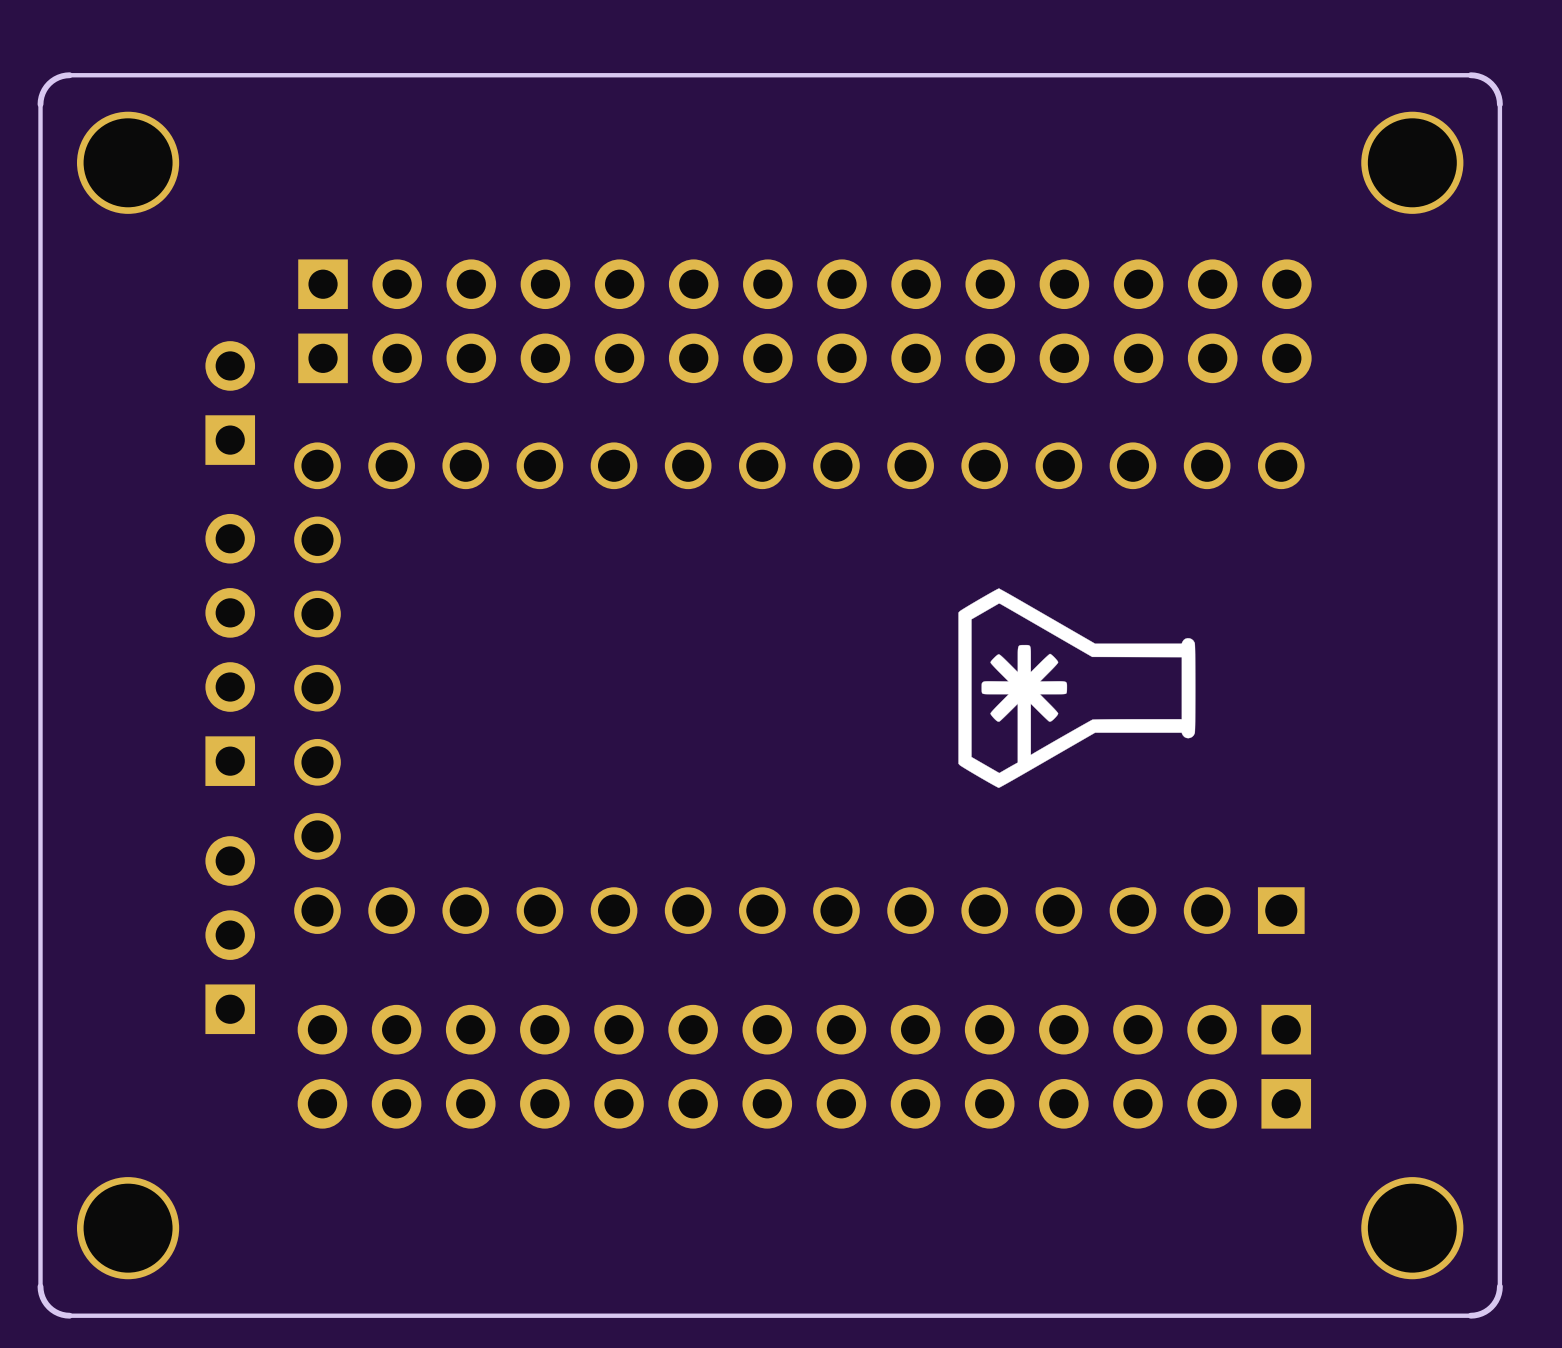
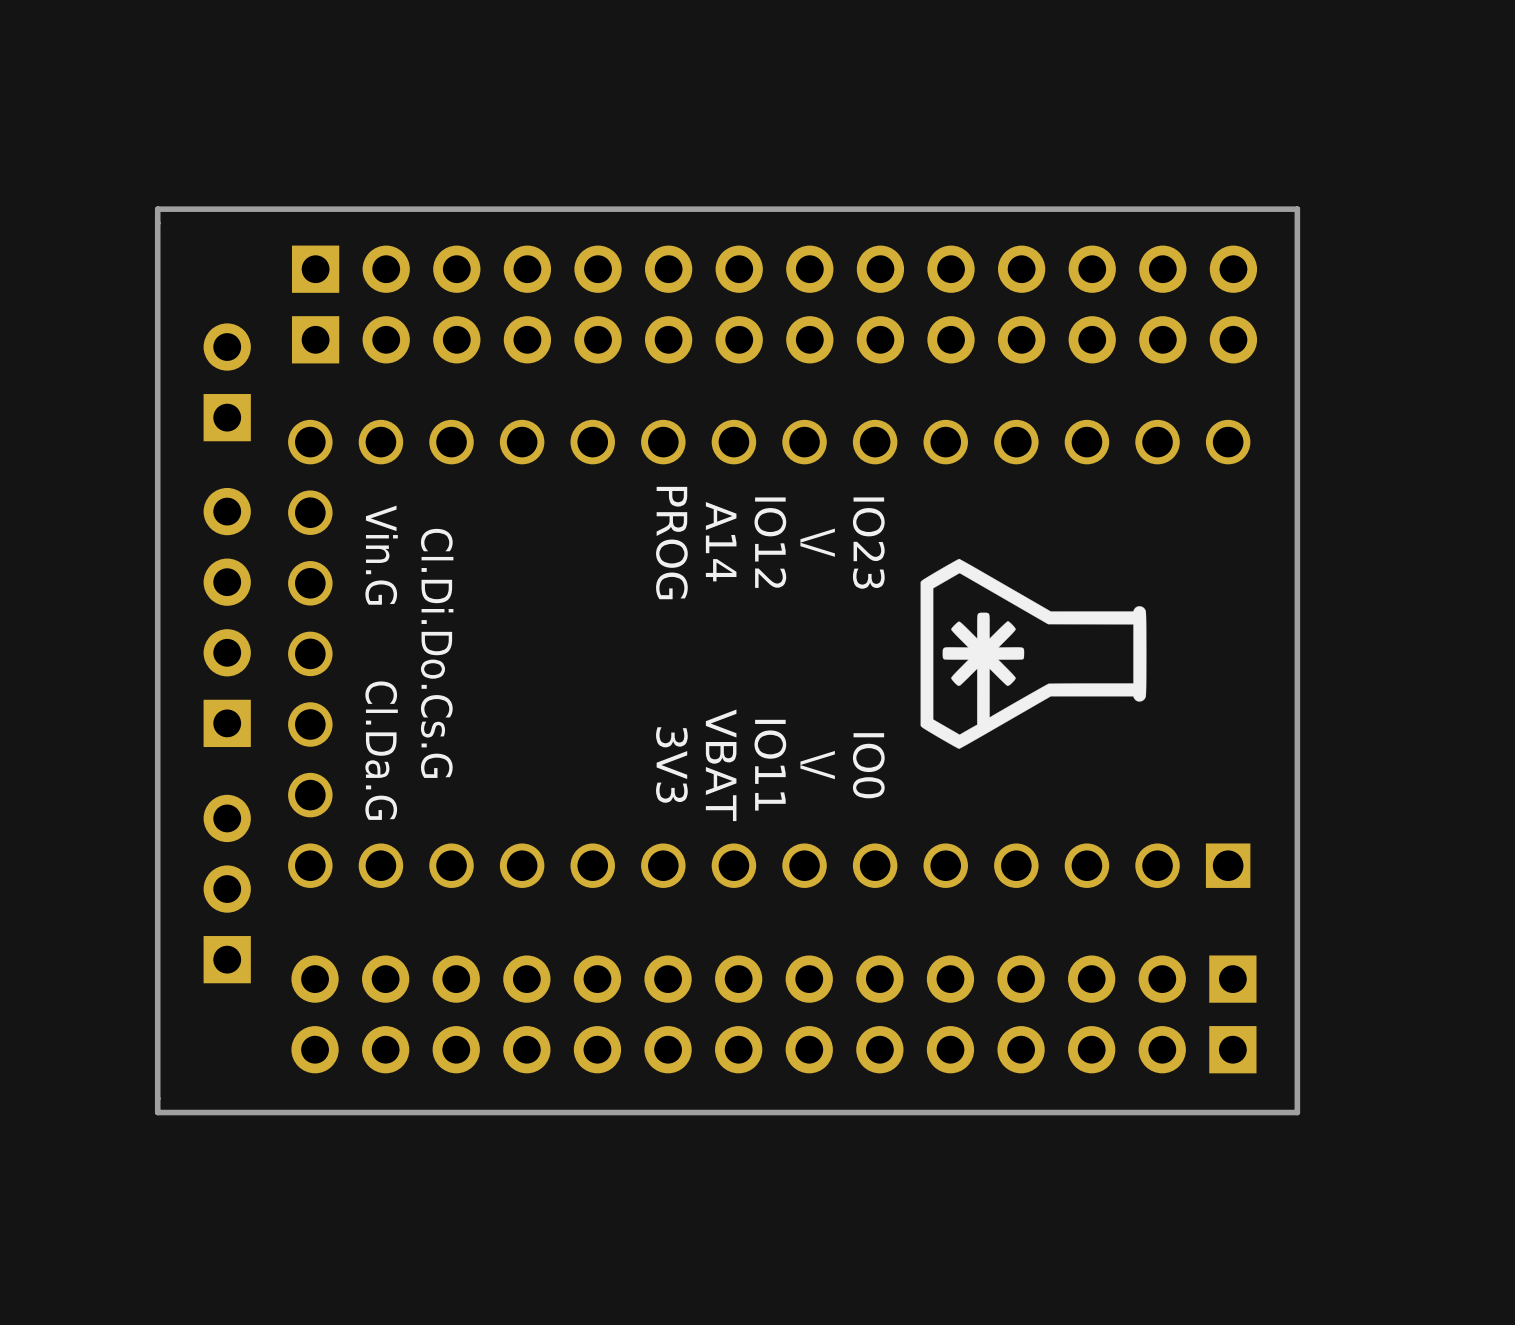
board edge: (1470, 75) (69, 75) (51, 81) (44, 89) (40, 104) (40, 1286) (46, 1304) (58, 1313) (69, 1315) (1470, 1315) (1488, 1309) (1497, 1297) (1499, 1286) (1499, 104) (1497, 93) (1491, 83) (1481, 77) (1470, 75) -> (1297, 209) (1297, 1112) (157, 1112) (157, 209) (1297, 209)
part: (128, 162) -> none
part: (1412, 162) -> none
text: none -> A14 (721, 541)
text: none -> PROG (671, 543)
text: none -> \/ (817, 542)
text: none -> IO12 (770, 542)
text: none -> IO23 (868, 543)
text: none -> Vin.G (381, 555)
text: none -> Cl.Di.Do.Cs.G (437, 653)
text: none -> Cl.Da.G (381, 750)
text: none -> 3V3 (671, 765)
text: none -> VBAT (721, 765)
text: none -> \/ (817, 765)
text: none -> IO11 (770, 765)
text: none -> IO0 (868, 765)
part: (128, 1228) -> none
part: (1412, 1228) -> none

